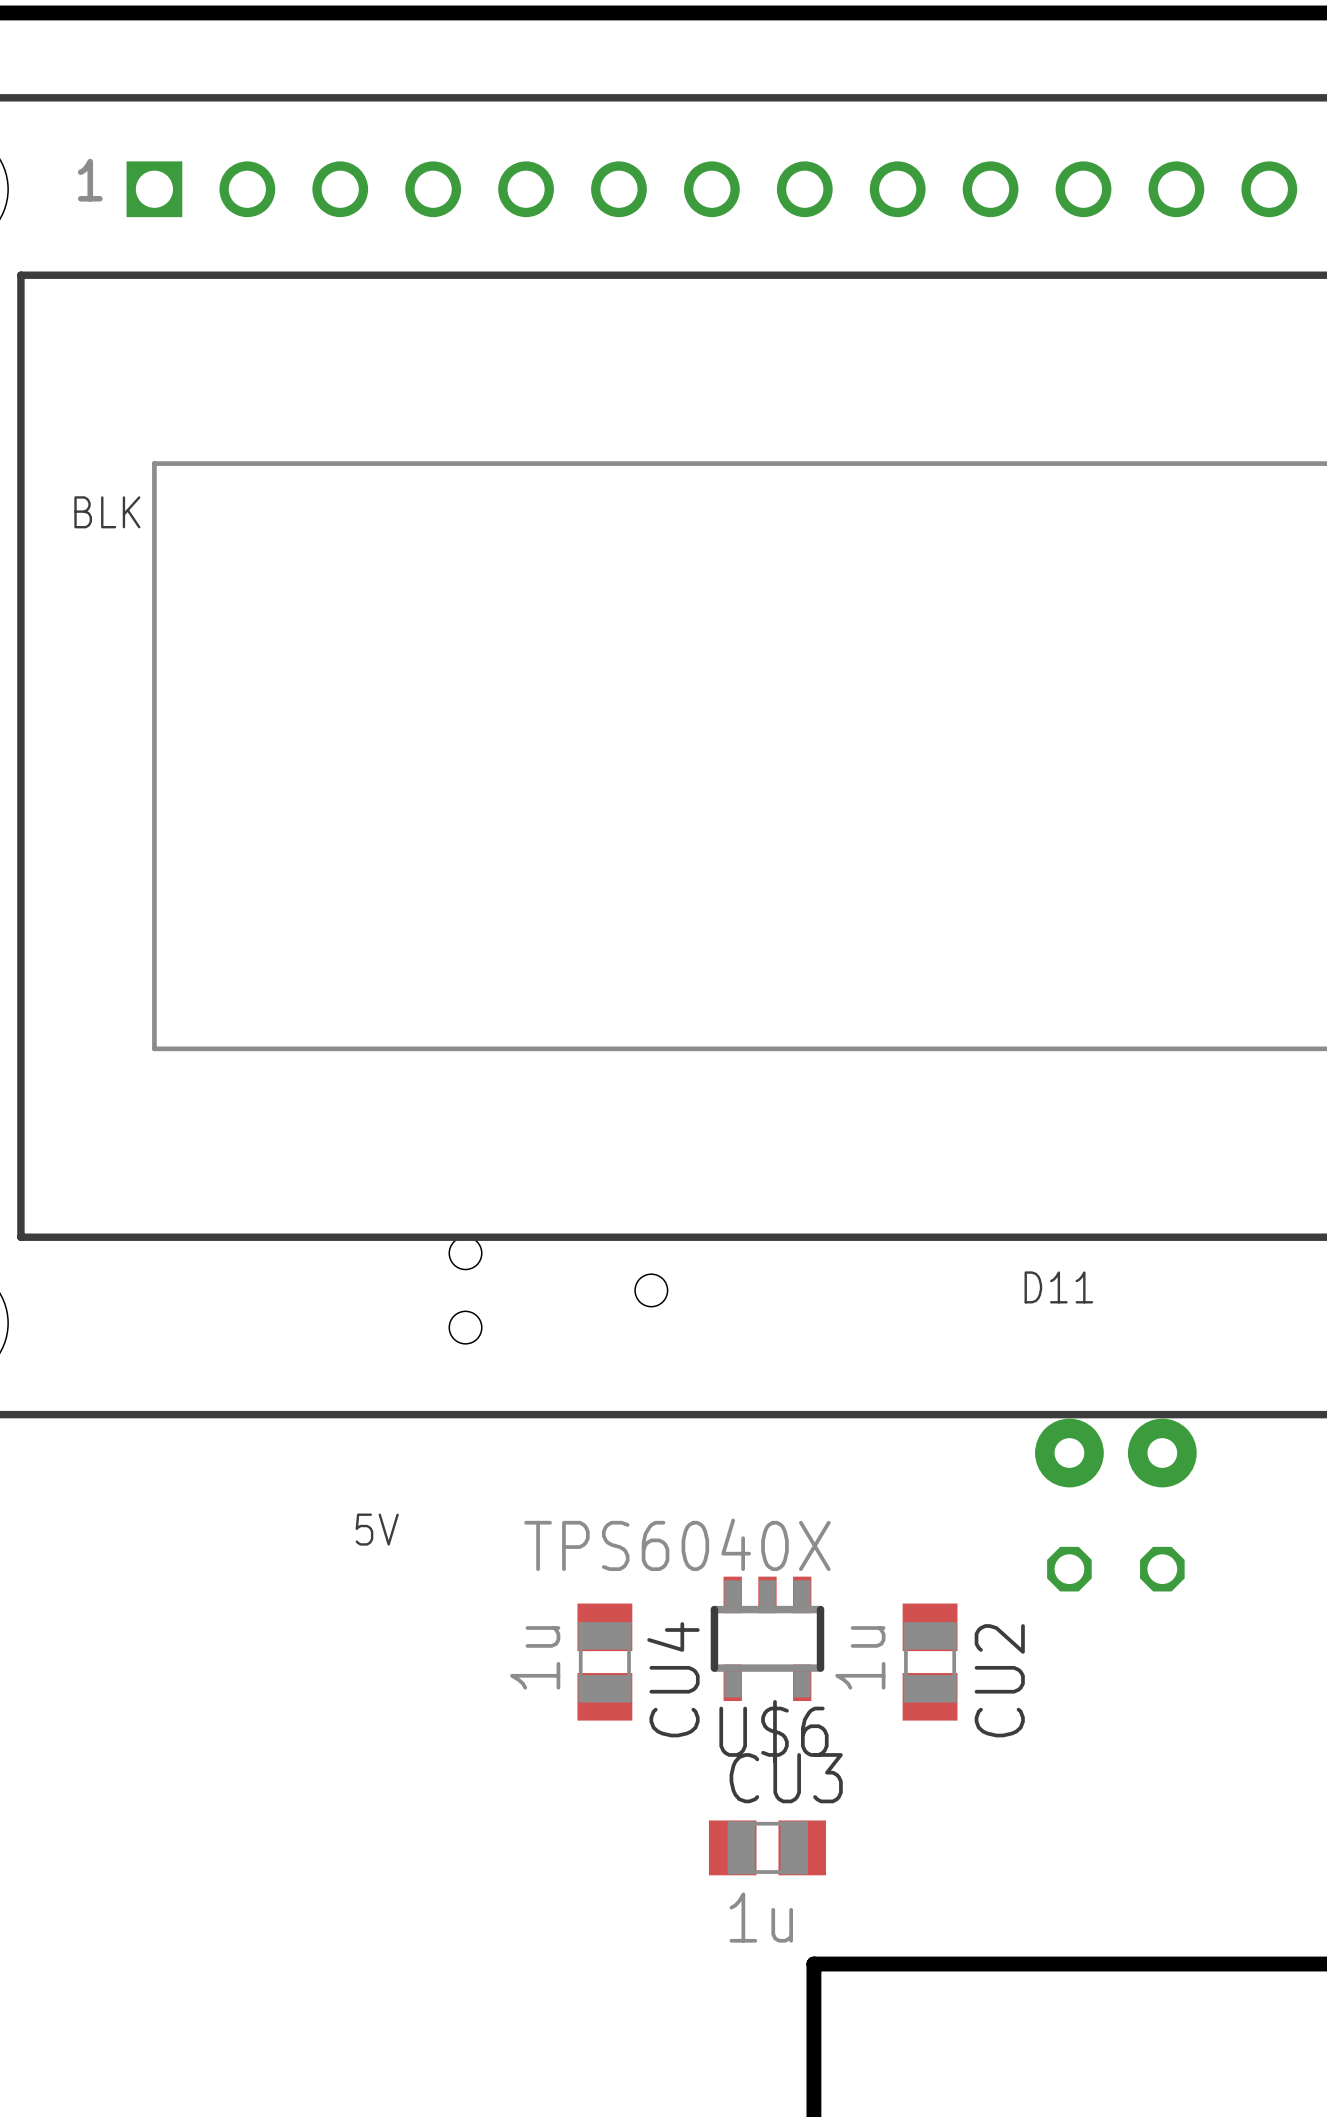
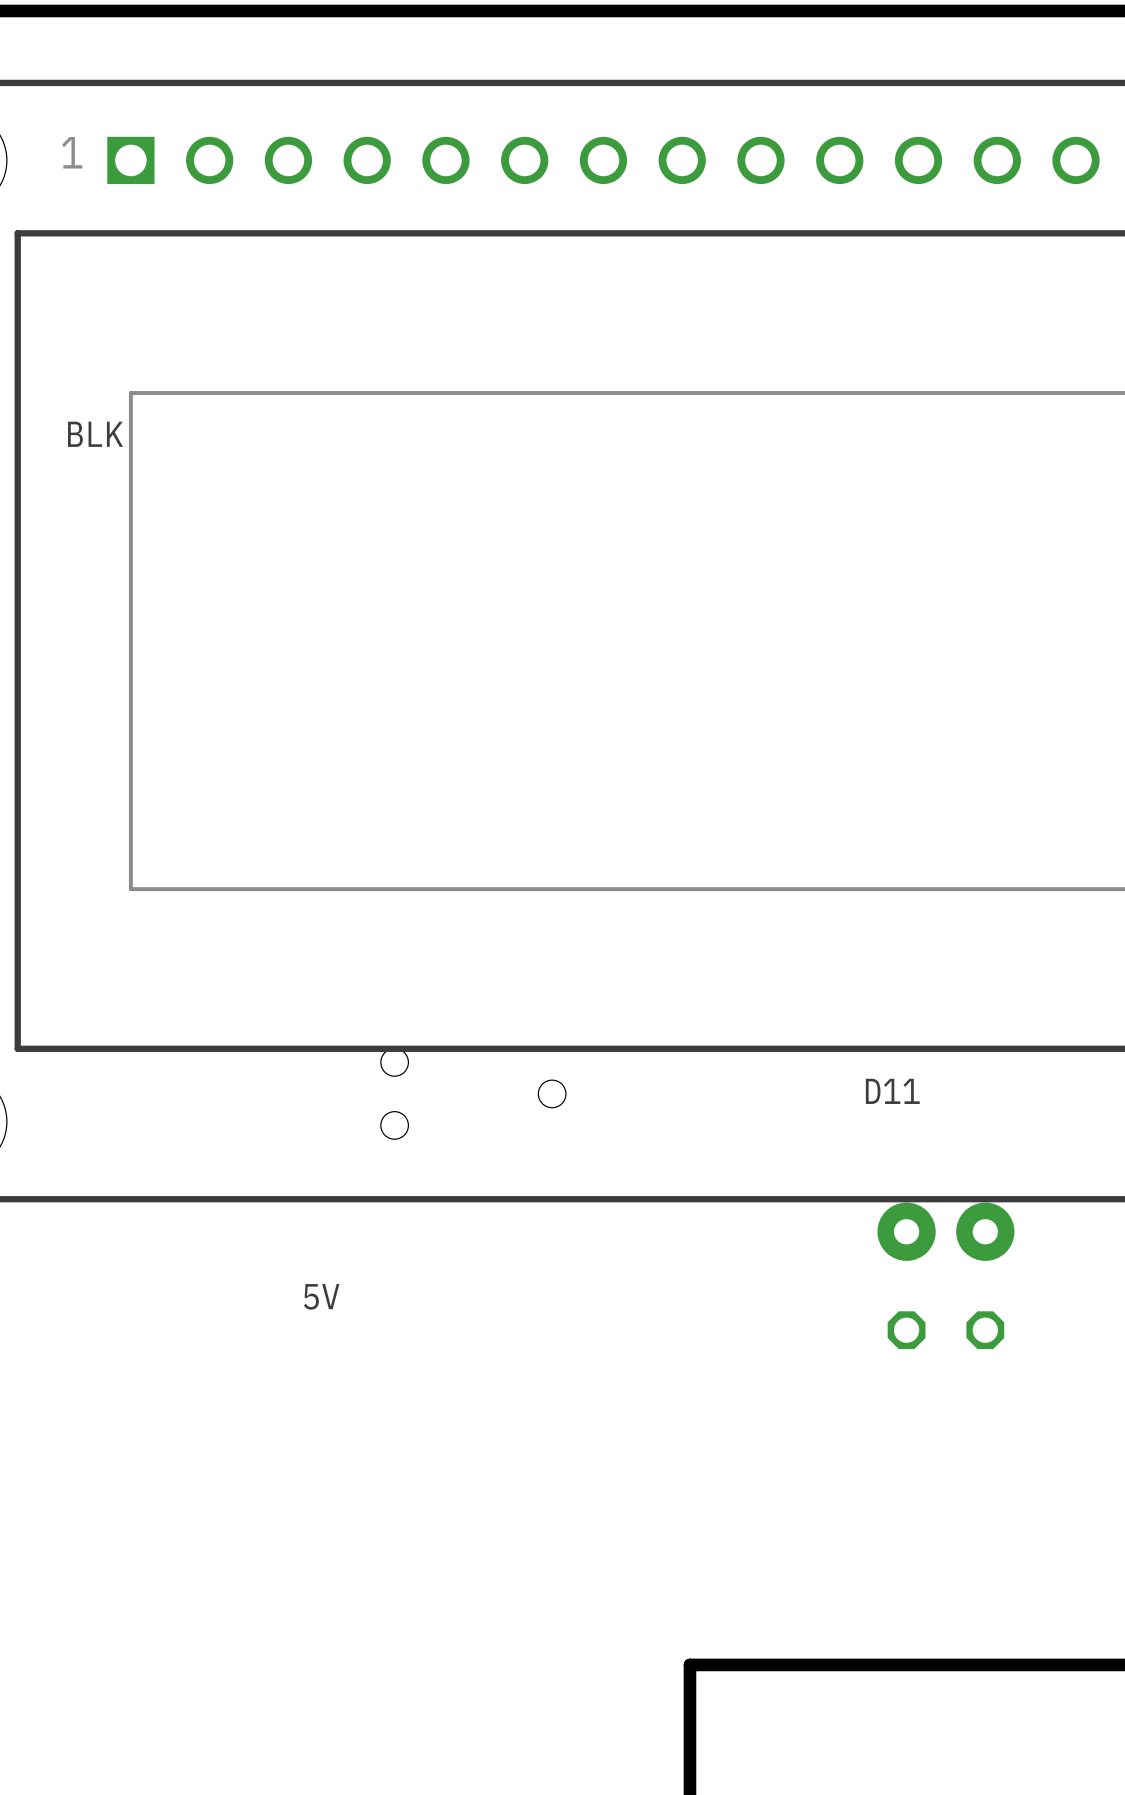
U$6: TPS6040X (767, 1638) -> none
CU4: 1u (604, 1662) -> none
CU2: 1u (930, 1662) -> none
CU3: 1u (767, 1847) -> none

